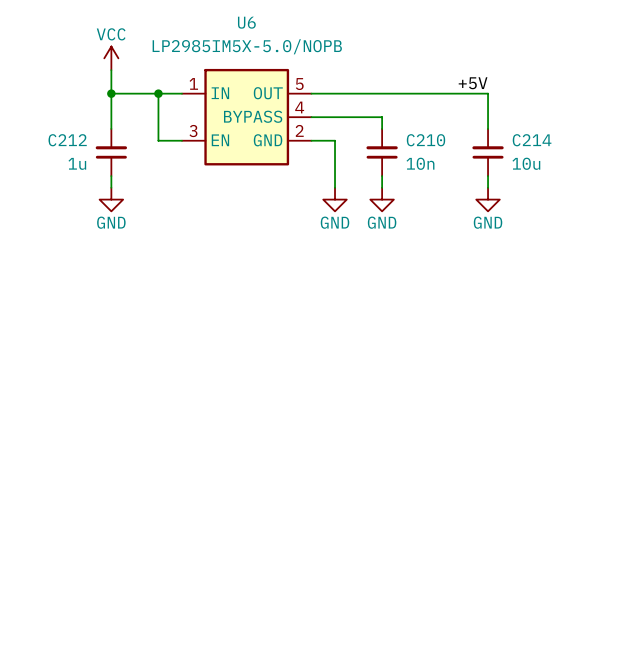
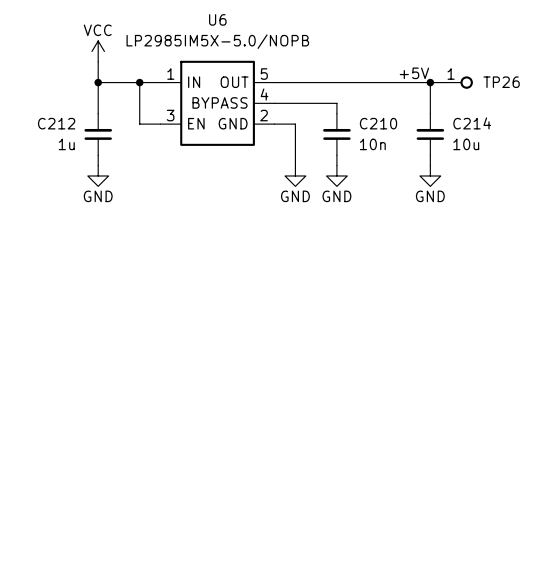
wire: none -> (430, 82) (440, 82)
junction: none -> (430, 82)
TP26: none -> (456, 82)

